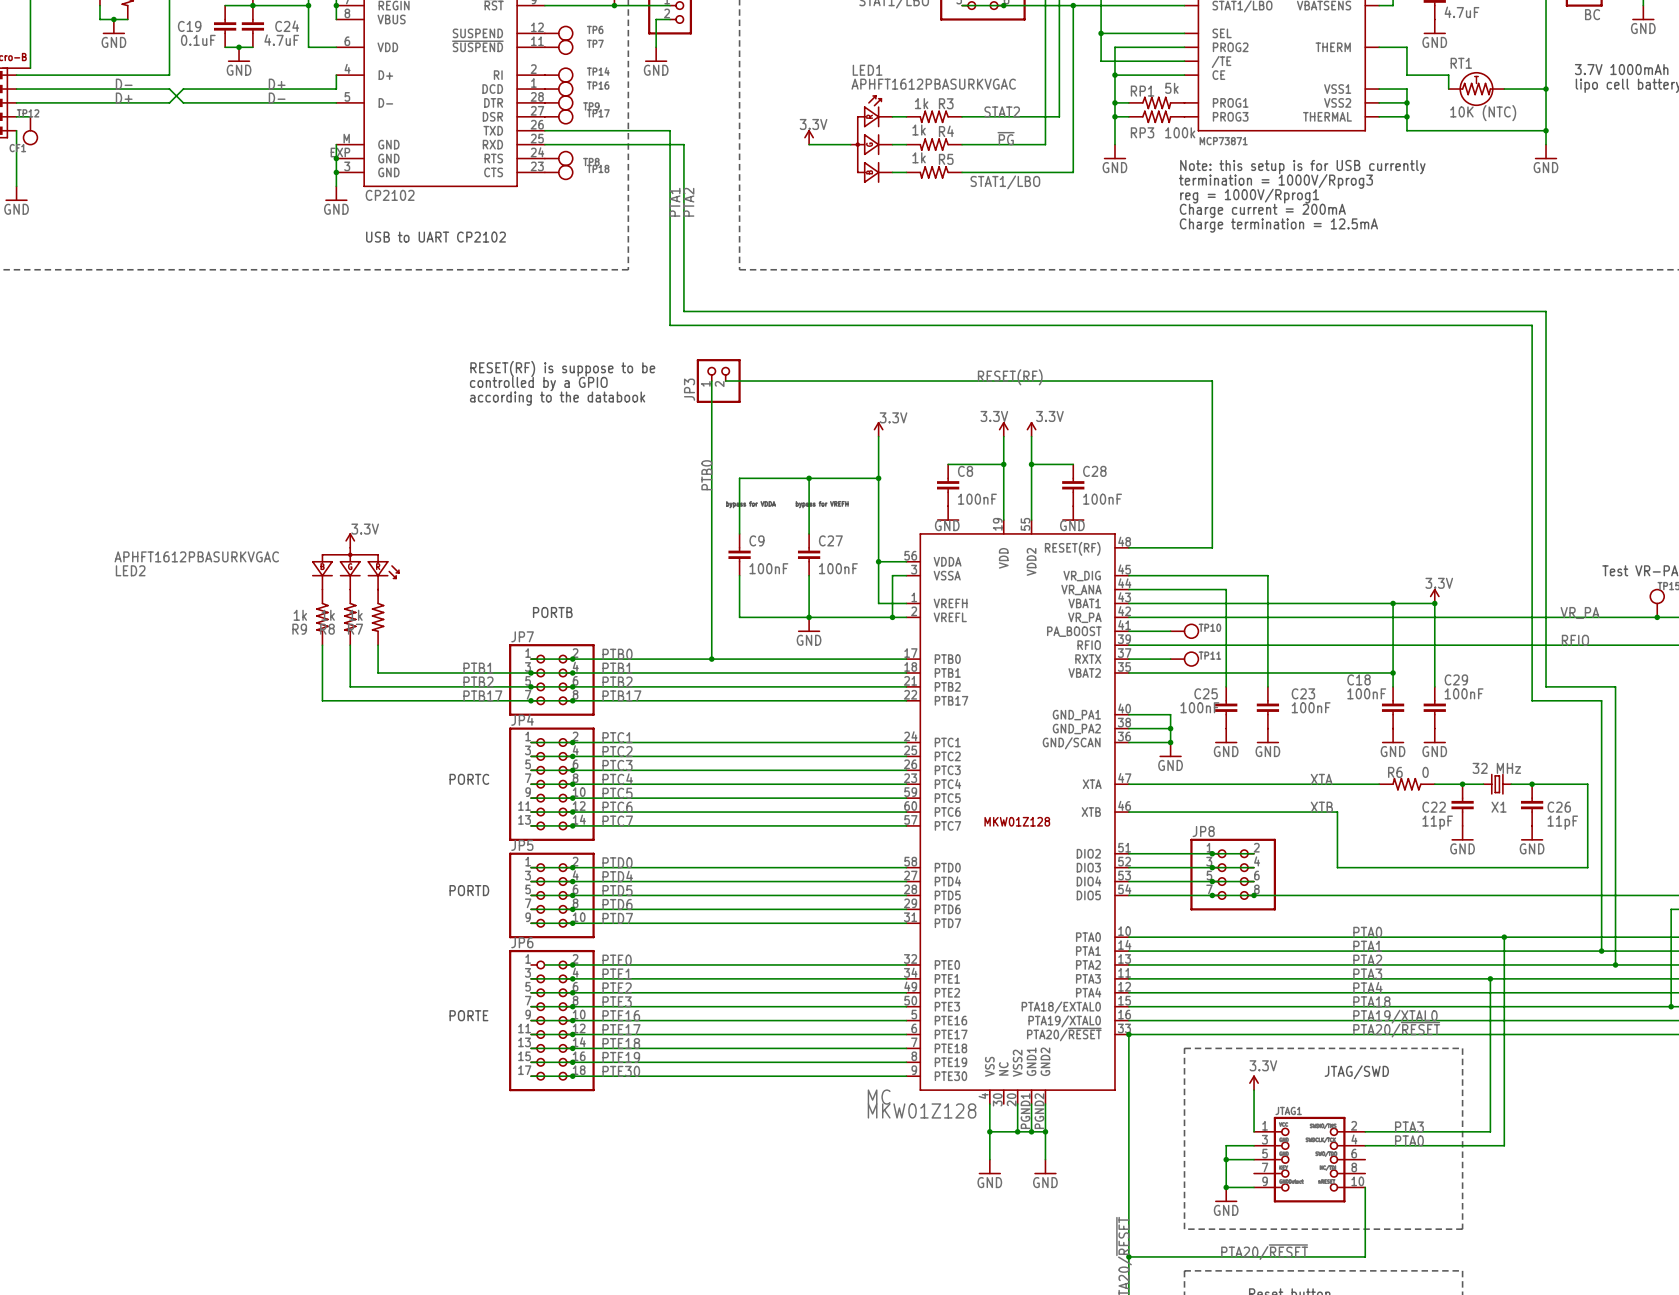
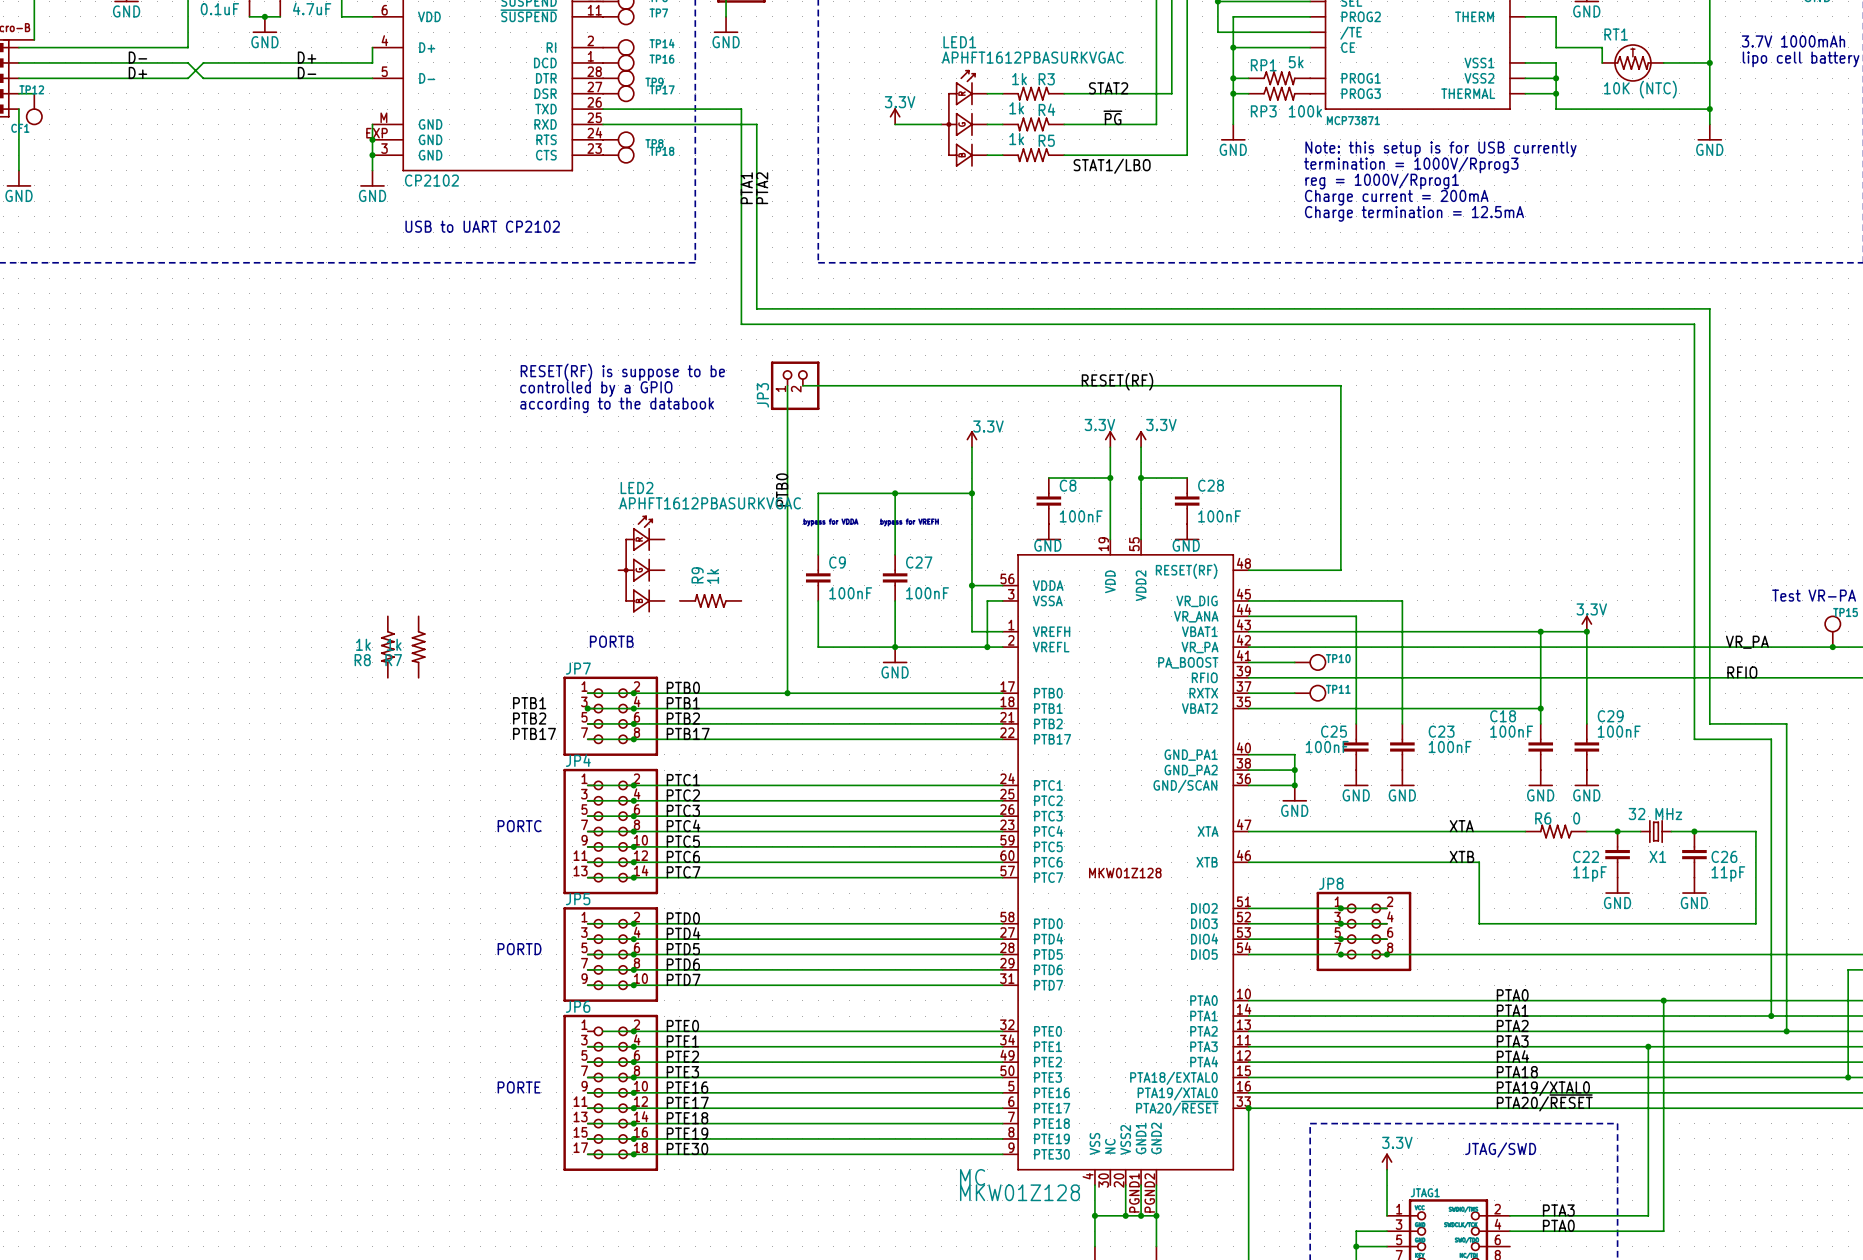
power symbol: 3.3V (350, 540) -> none
LED2 value position: APHFT1612PBASURKVGAC (196, 556) -> APHFT1612PBASURKVGAC (710, 503)
LED2 rotation: 0° (355, 565) -> 90° counterclockwise (638, 564)
LED2 position: (355, 568) -> (641, 564)
LED2 name position: LED2 (130, 570) -> LED2 (636, 487)
R9 rotation: 0° (322, 617) -> 90° clockwise (710, 600)
R9 position: (322, 617) -> (710, 600)
wire: (322, 645) (322, 700) (531, 700) -> none
wire: (350, 645) (350, 686) (531, 686) -> none
wire: (378, 645) (378, 672) (531, 672) -> none
junction: (531, 686) -> none
junction: (531, 700) -> none

